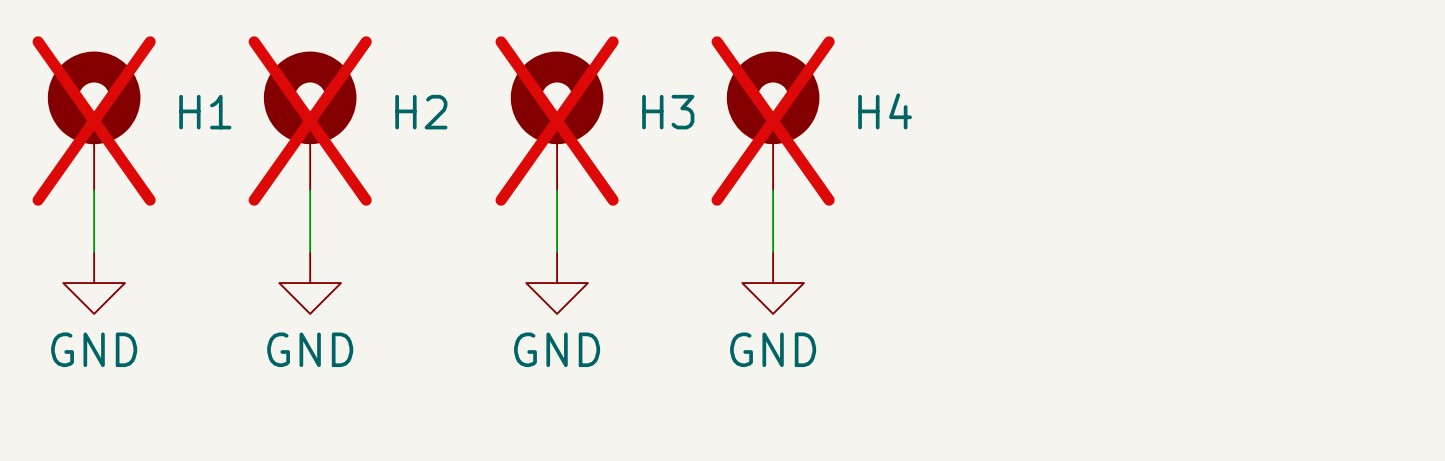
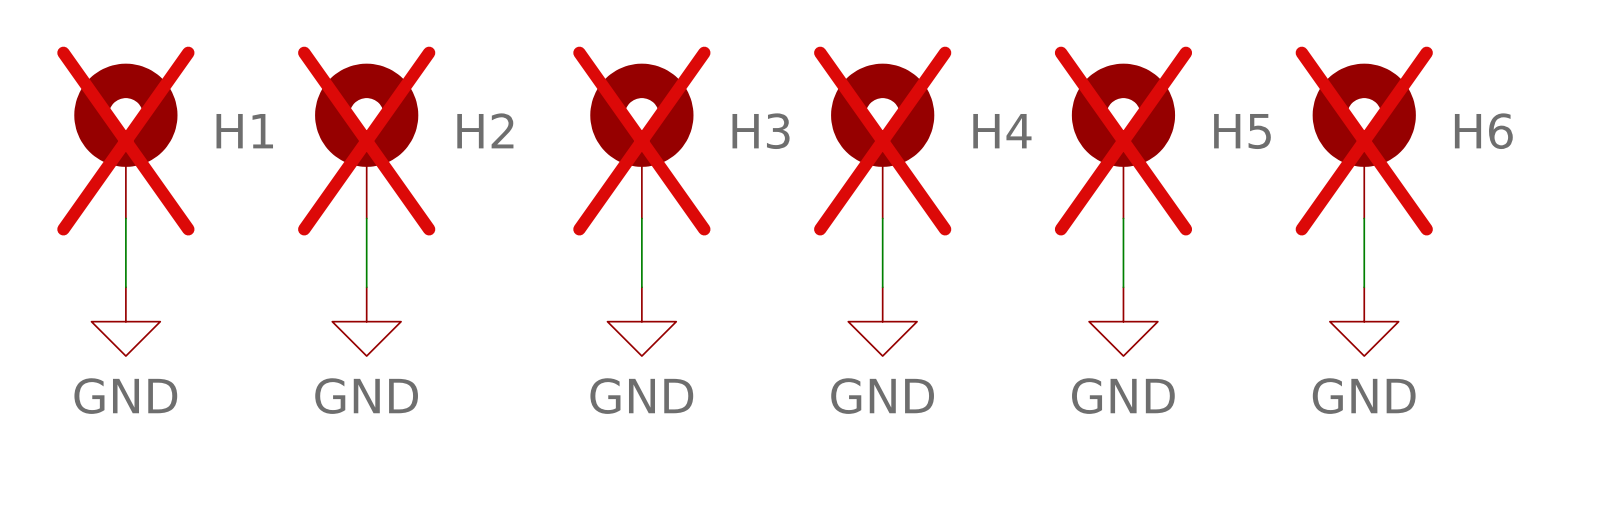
H5: none -> (1123, 141)
H6: none -> (1364, 141)
wire: none -> (1123, 218) (1123, 287)
wire: none -> (1364, 218) (1364, 287)
power symbol: none -> GND (1123, 321)
power symbol: none -> GND (1364, 321)

